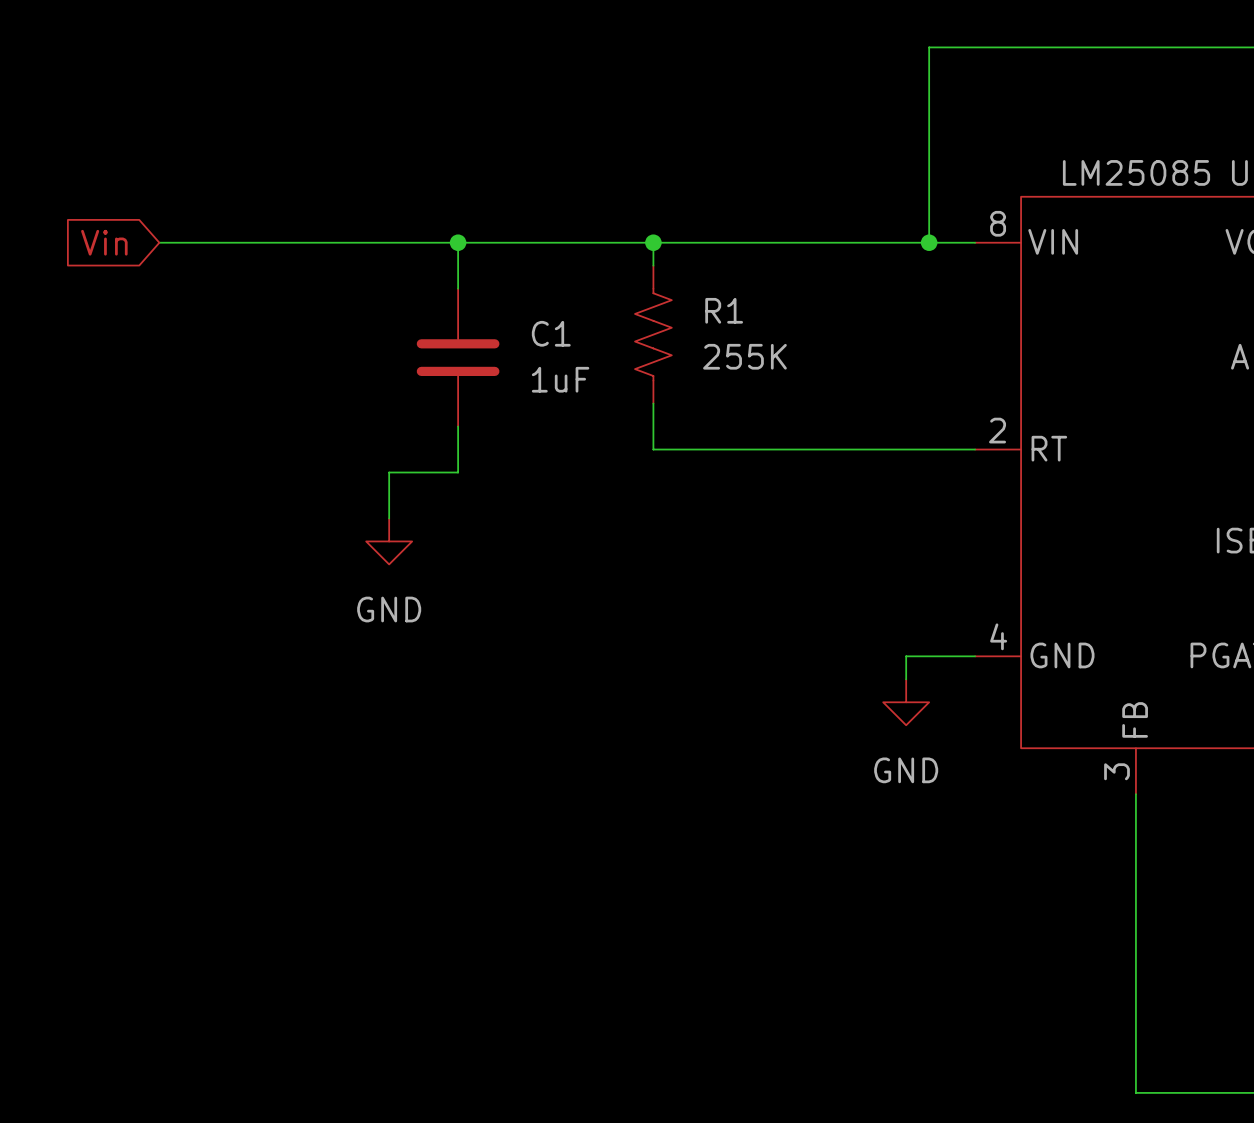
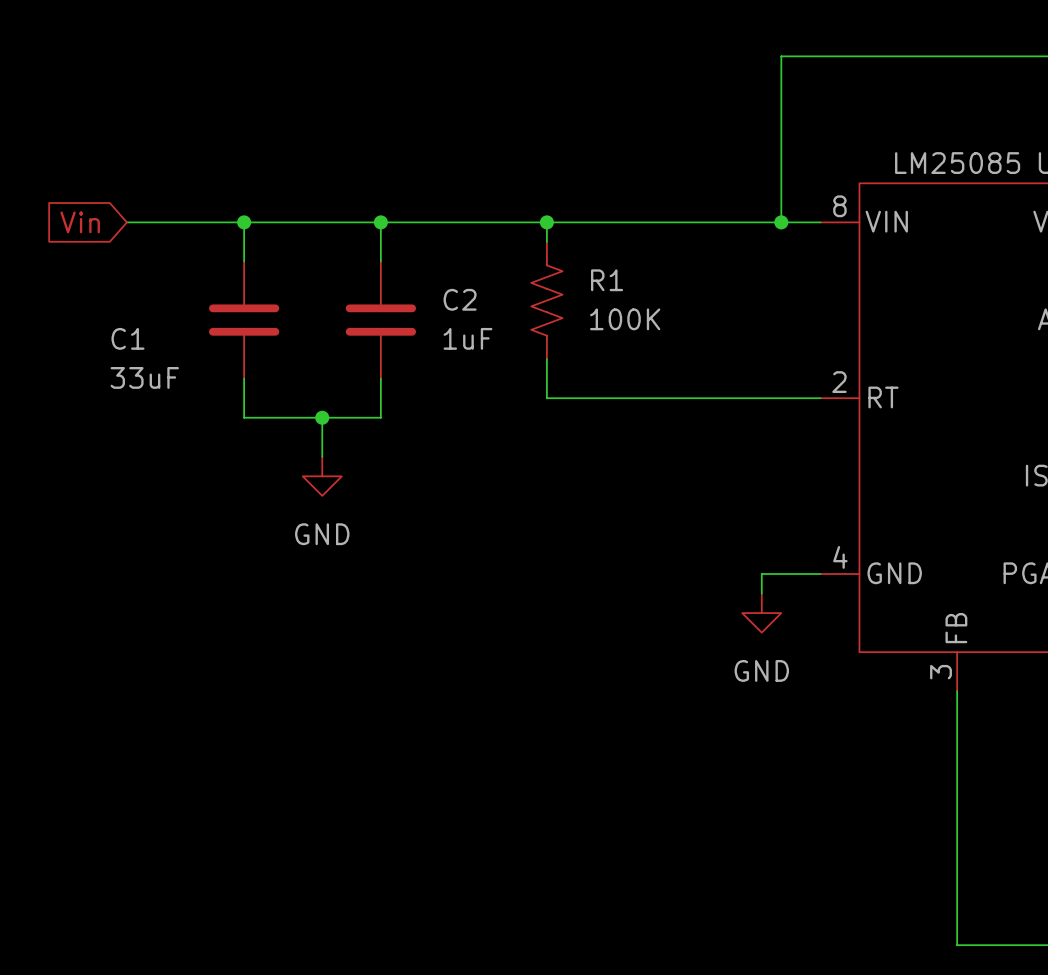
wire: none -> (244, 222) (244, 261)
junction: none -> (244, 222)
C1 name: C1 (551, 333) -> C2 (460, 299)
R1 value: 255K (744, 356) -> 100K (625, 319)
C1: none -> 33uF (244, 320)
wire: none -> (244, 378) (244, 417) (322, 417)
junction: none -> (322, 417)

